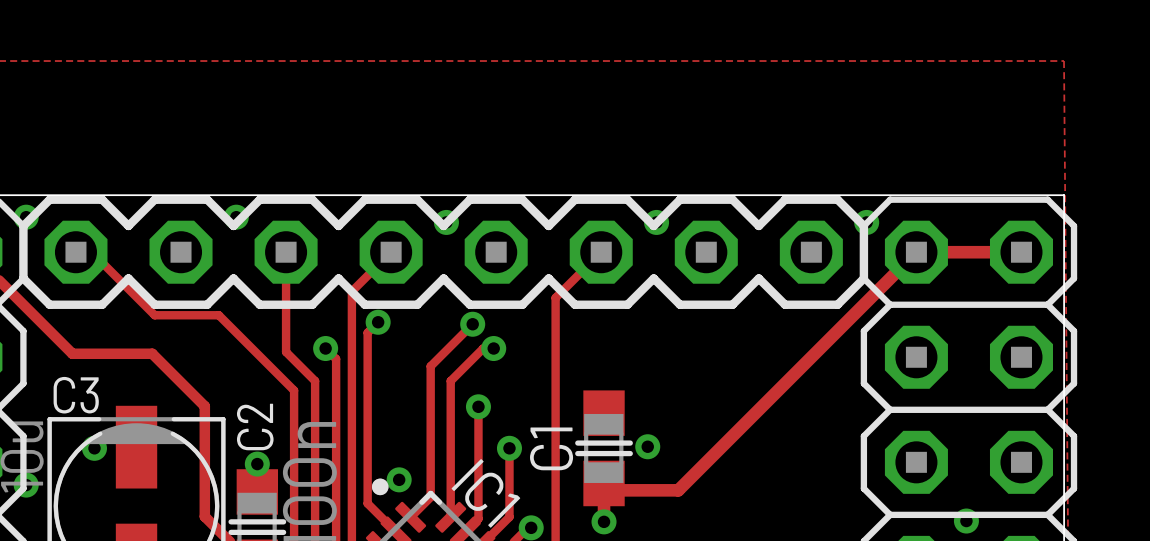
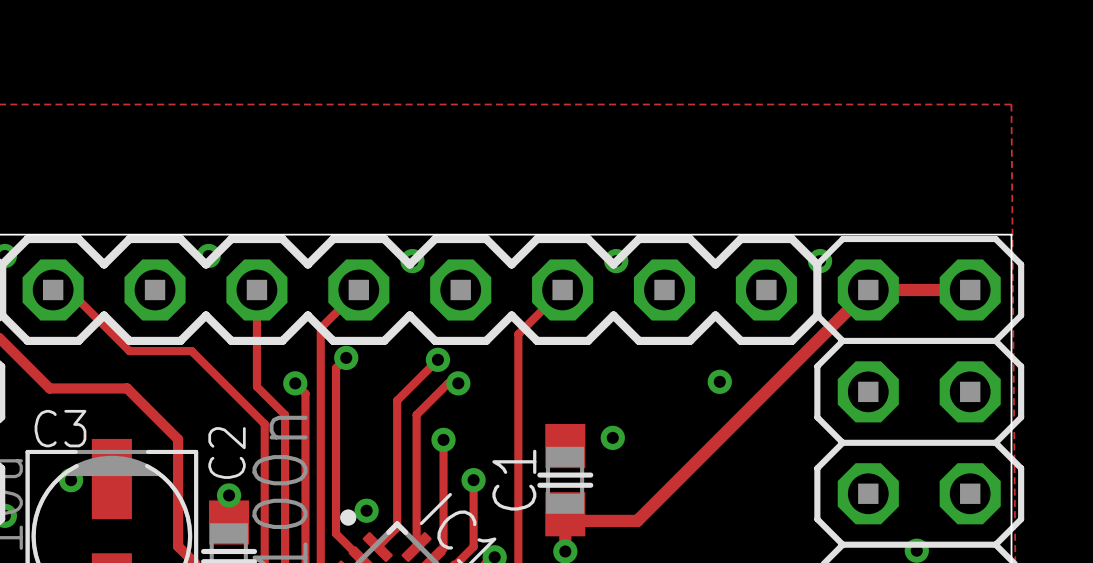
via: none -> (719, 381)
via position: (647, 446) -> (612, 437)

